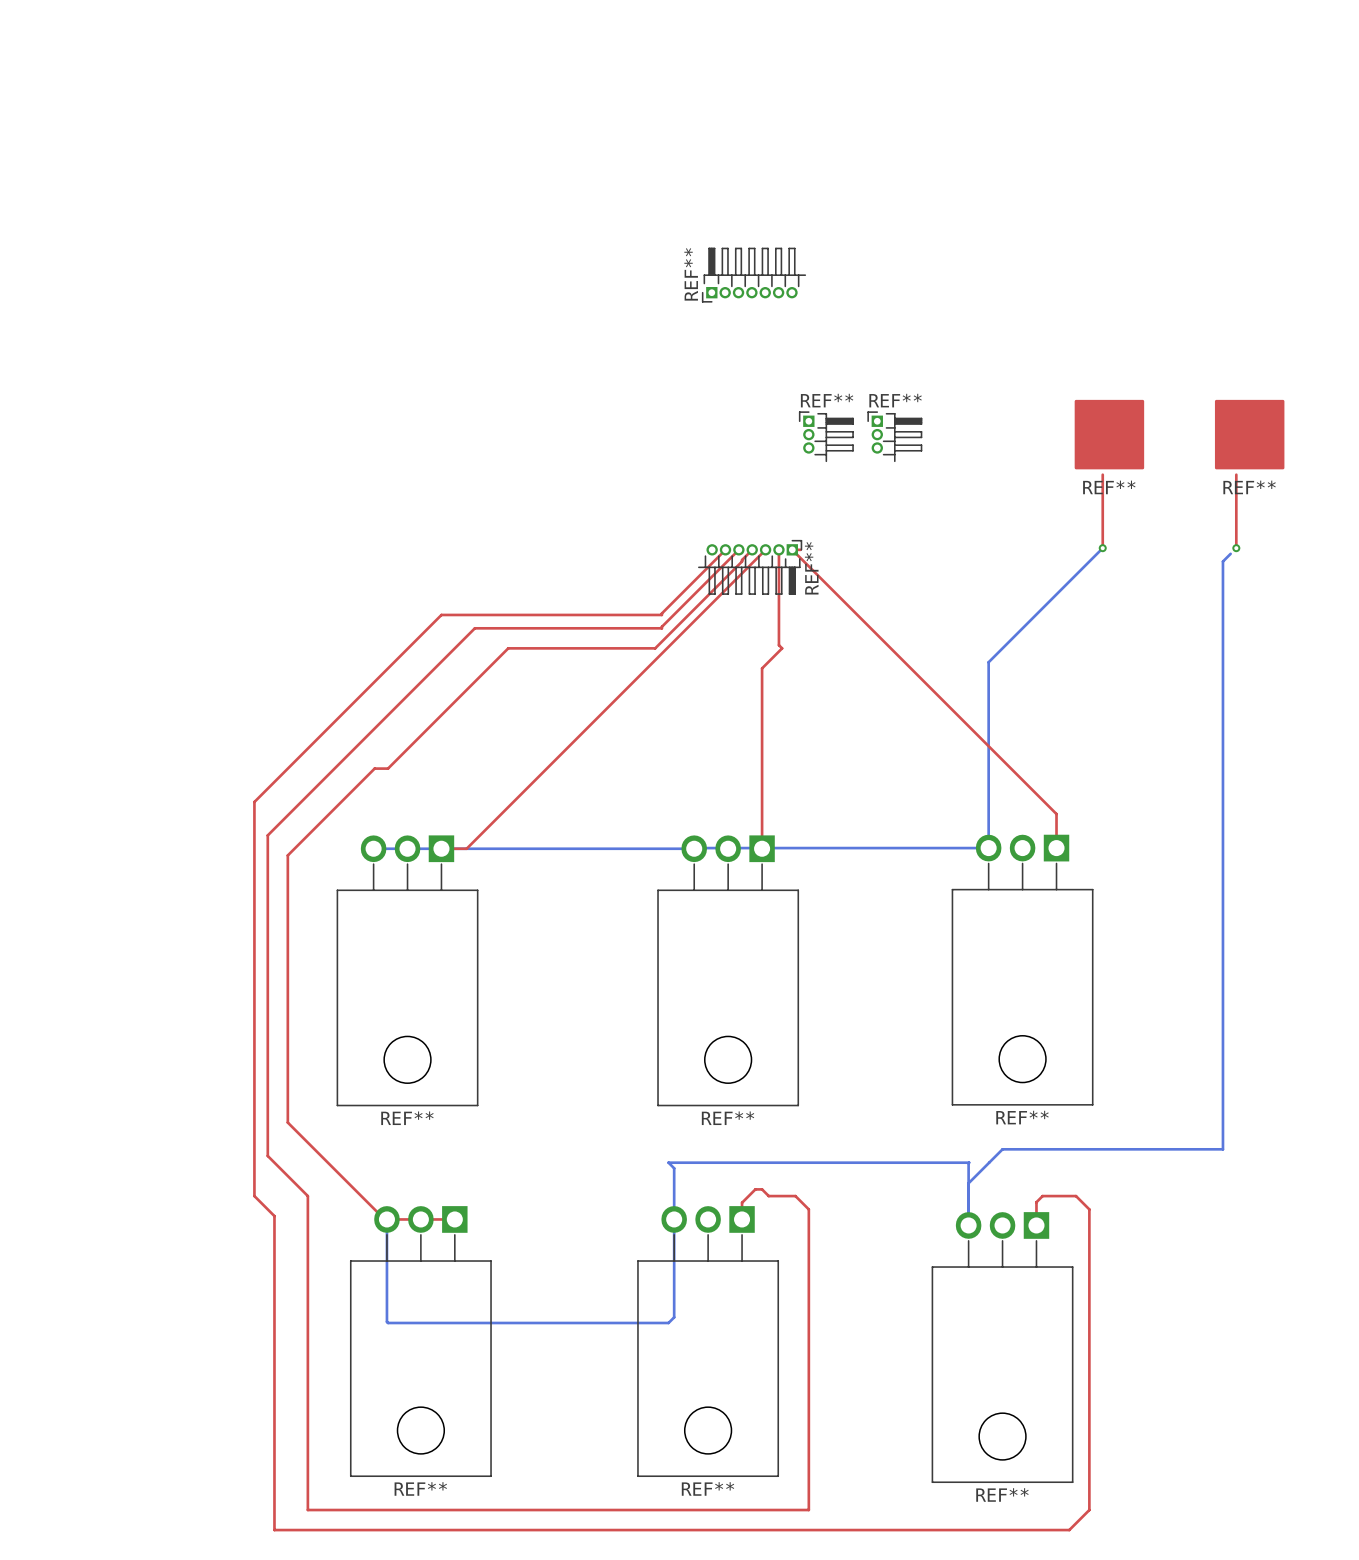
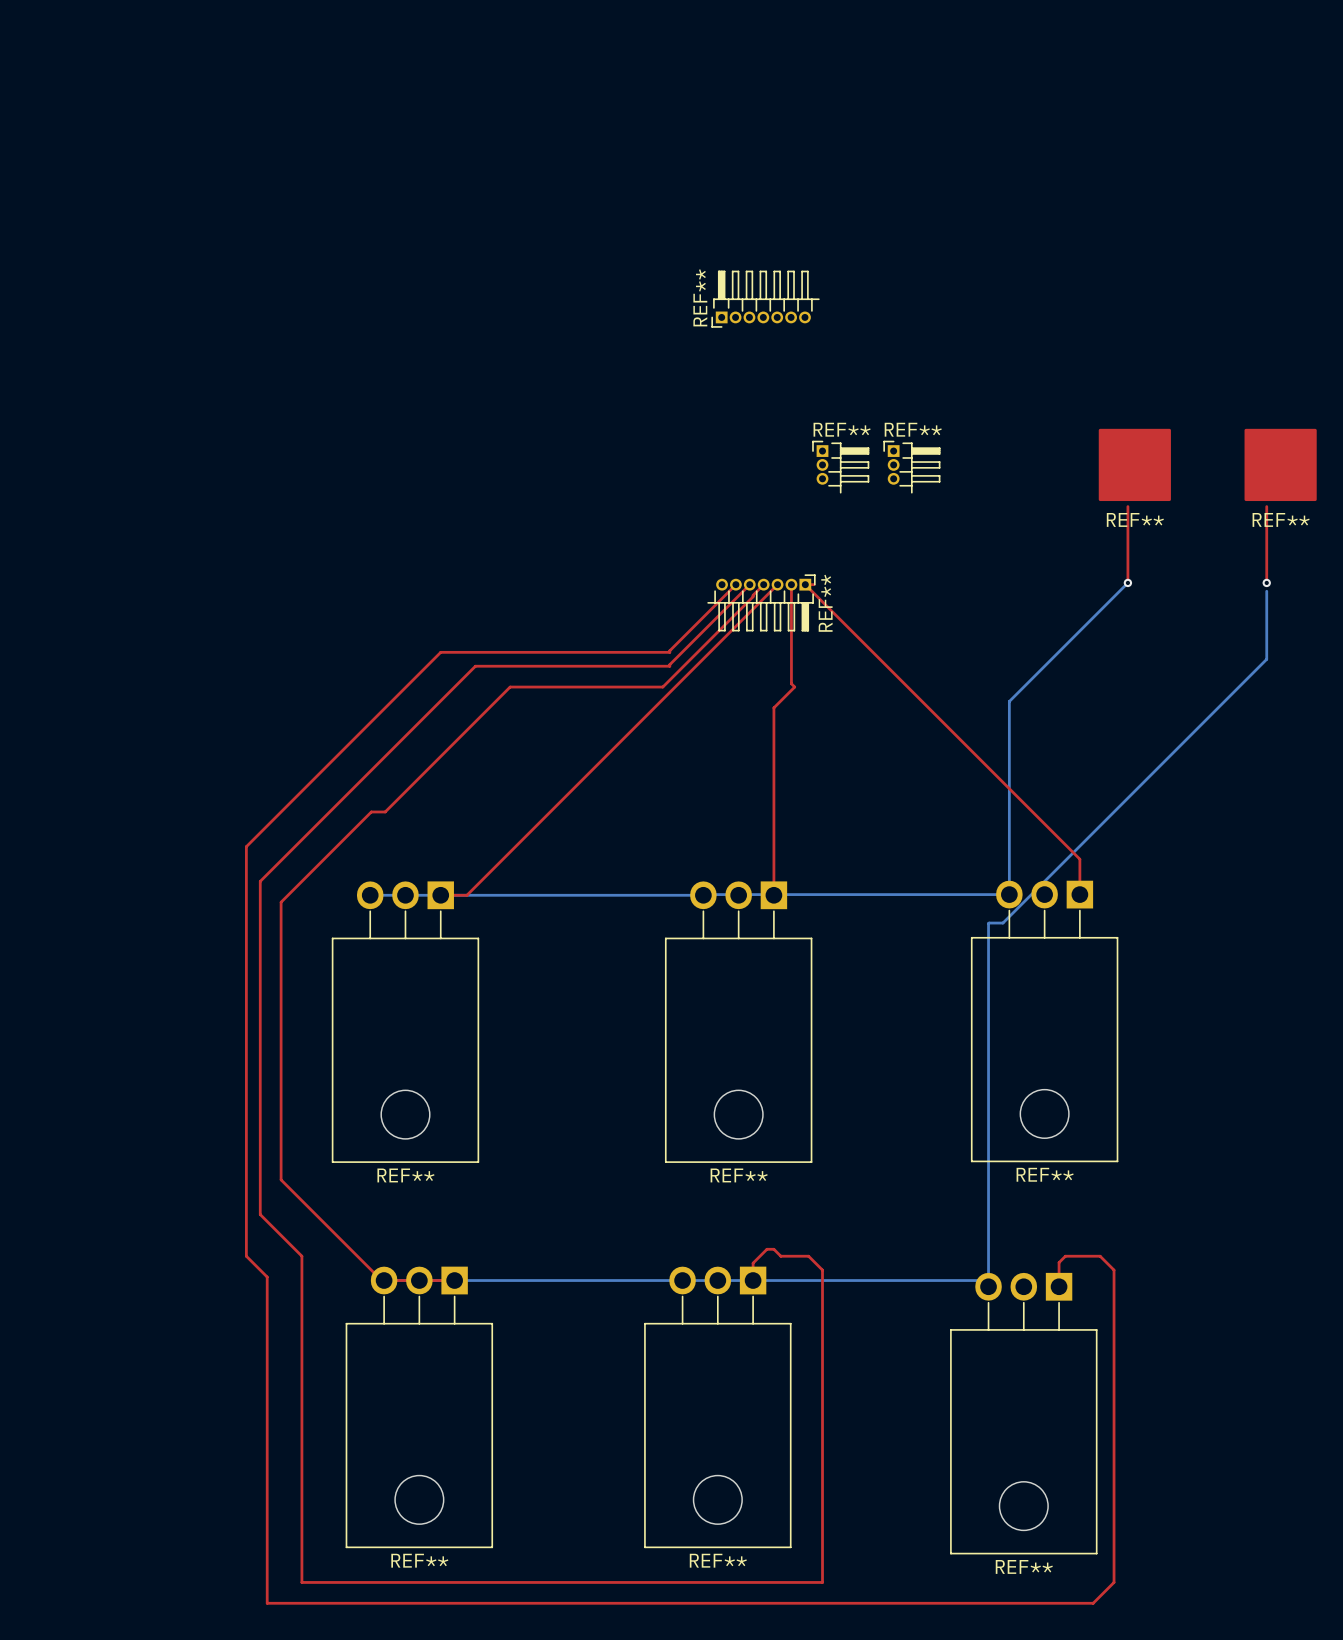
bottom track: (1230, 553) (1222, 561) (1222, 1149) (1002, 1149) (968, 1183) -> none
bottom track: none -> (1266, 591) (1266, 659) (1002, 923) (988, 923) (988, 1222)
bottom track: (968, 1163) (668, 1162) (674, 1168) (674, 1317) (668, 1322) (388, 1322) (386, 1219) -> (982, 1280) (384, 1280)

